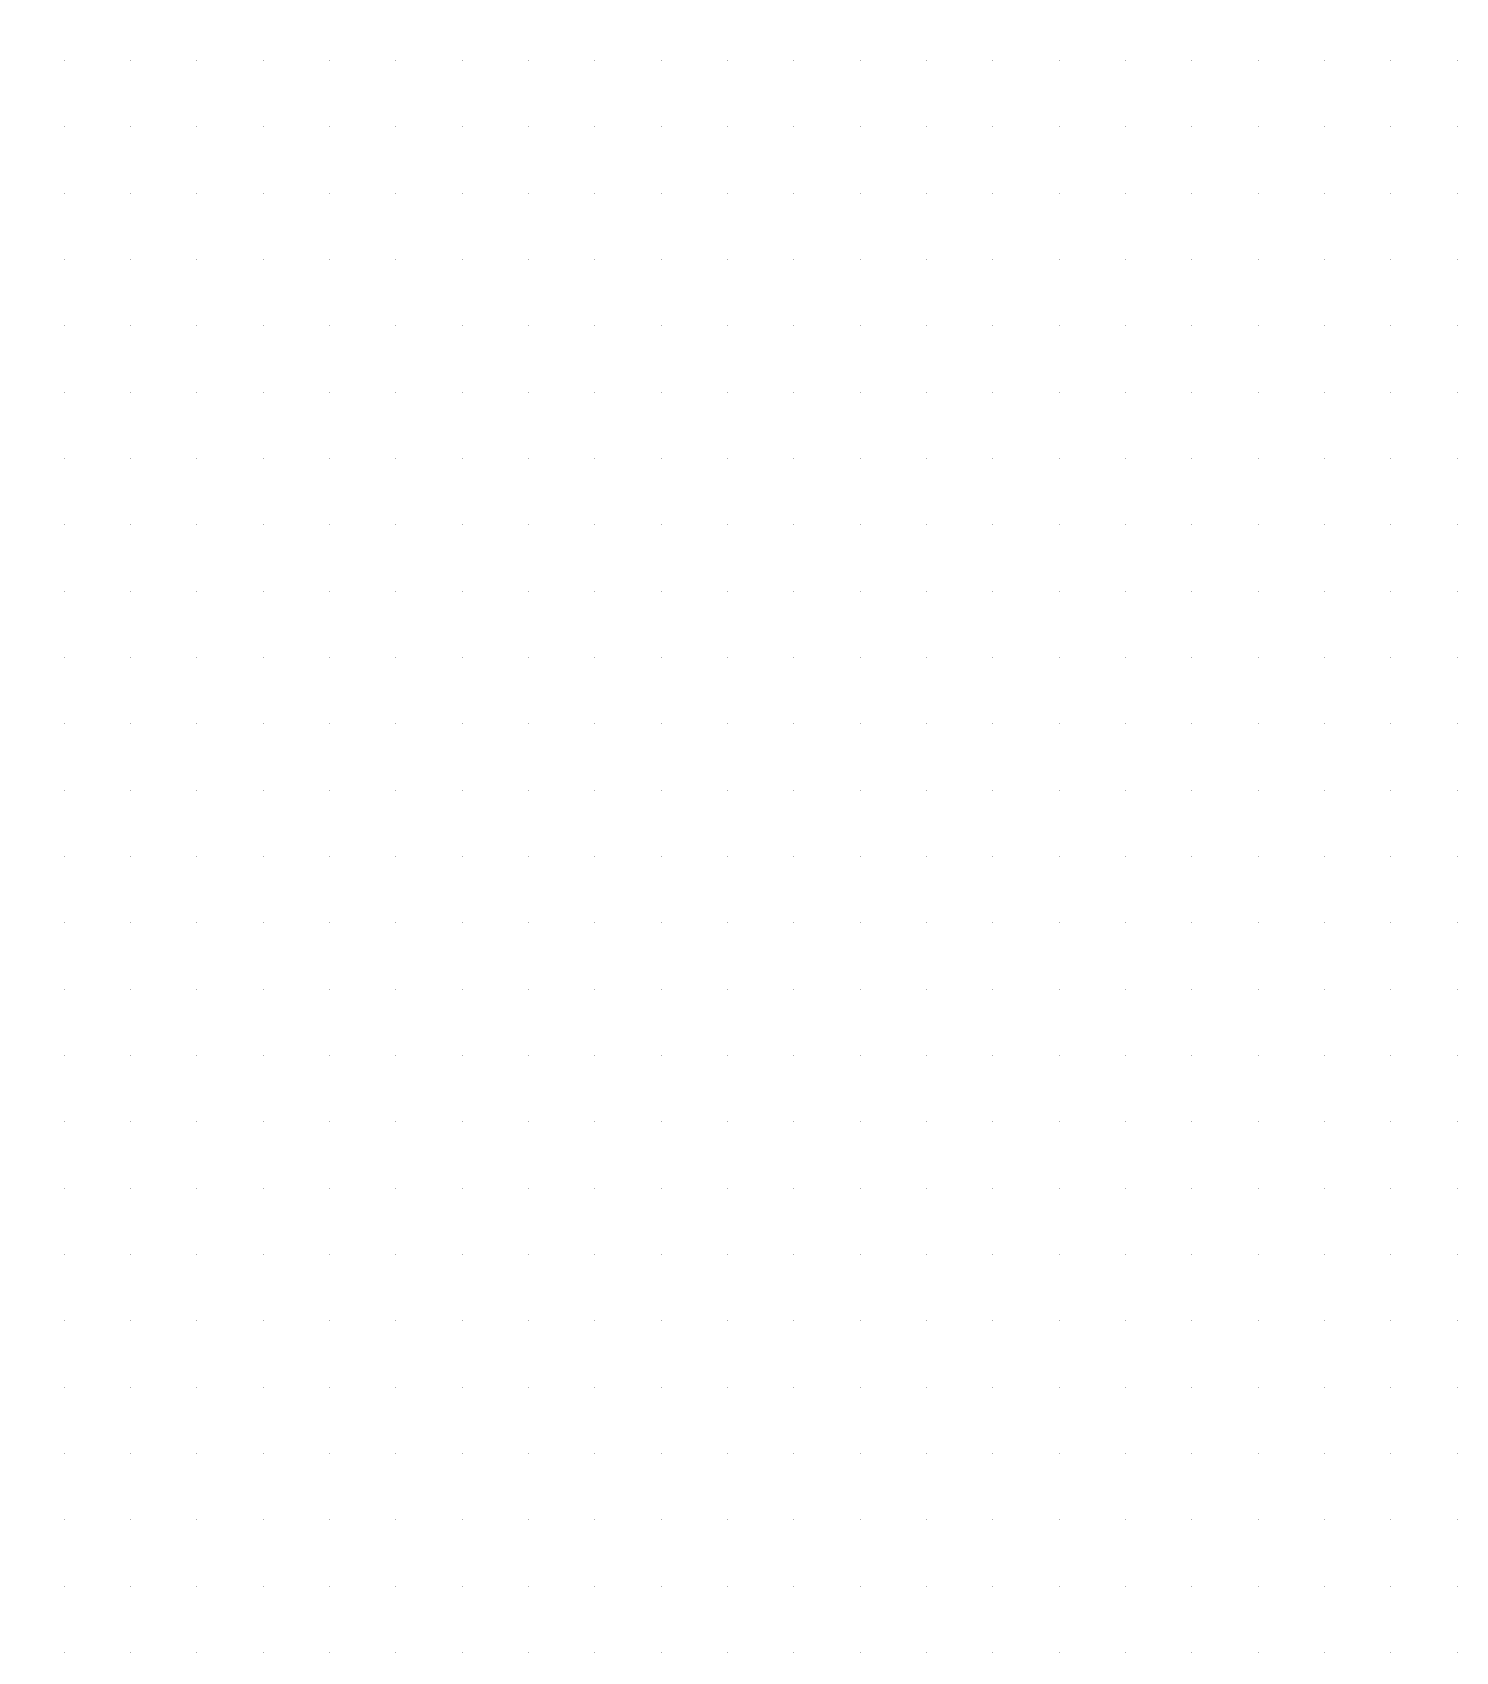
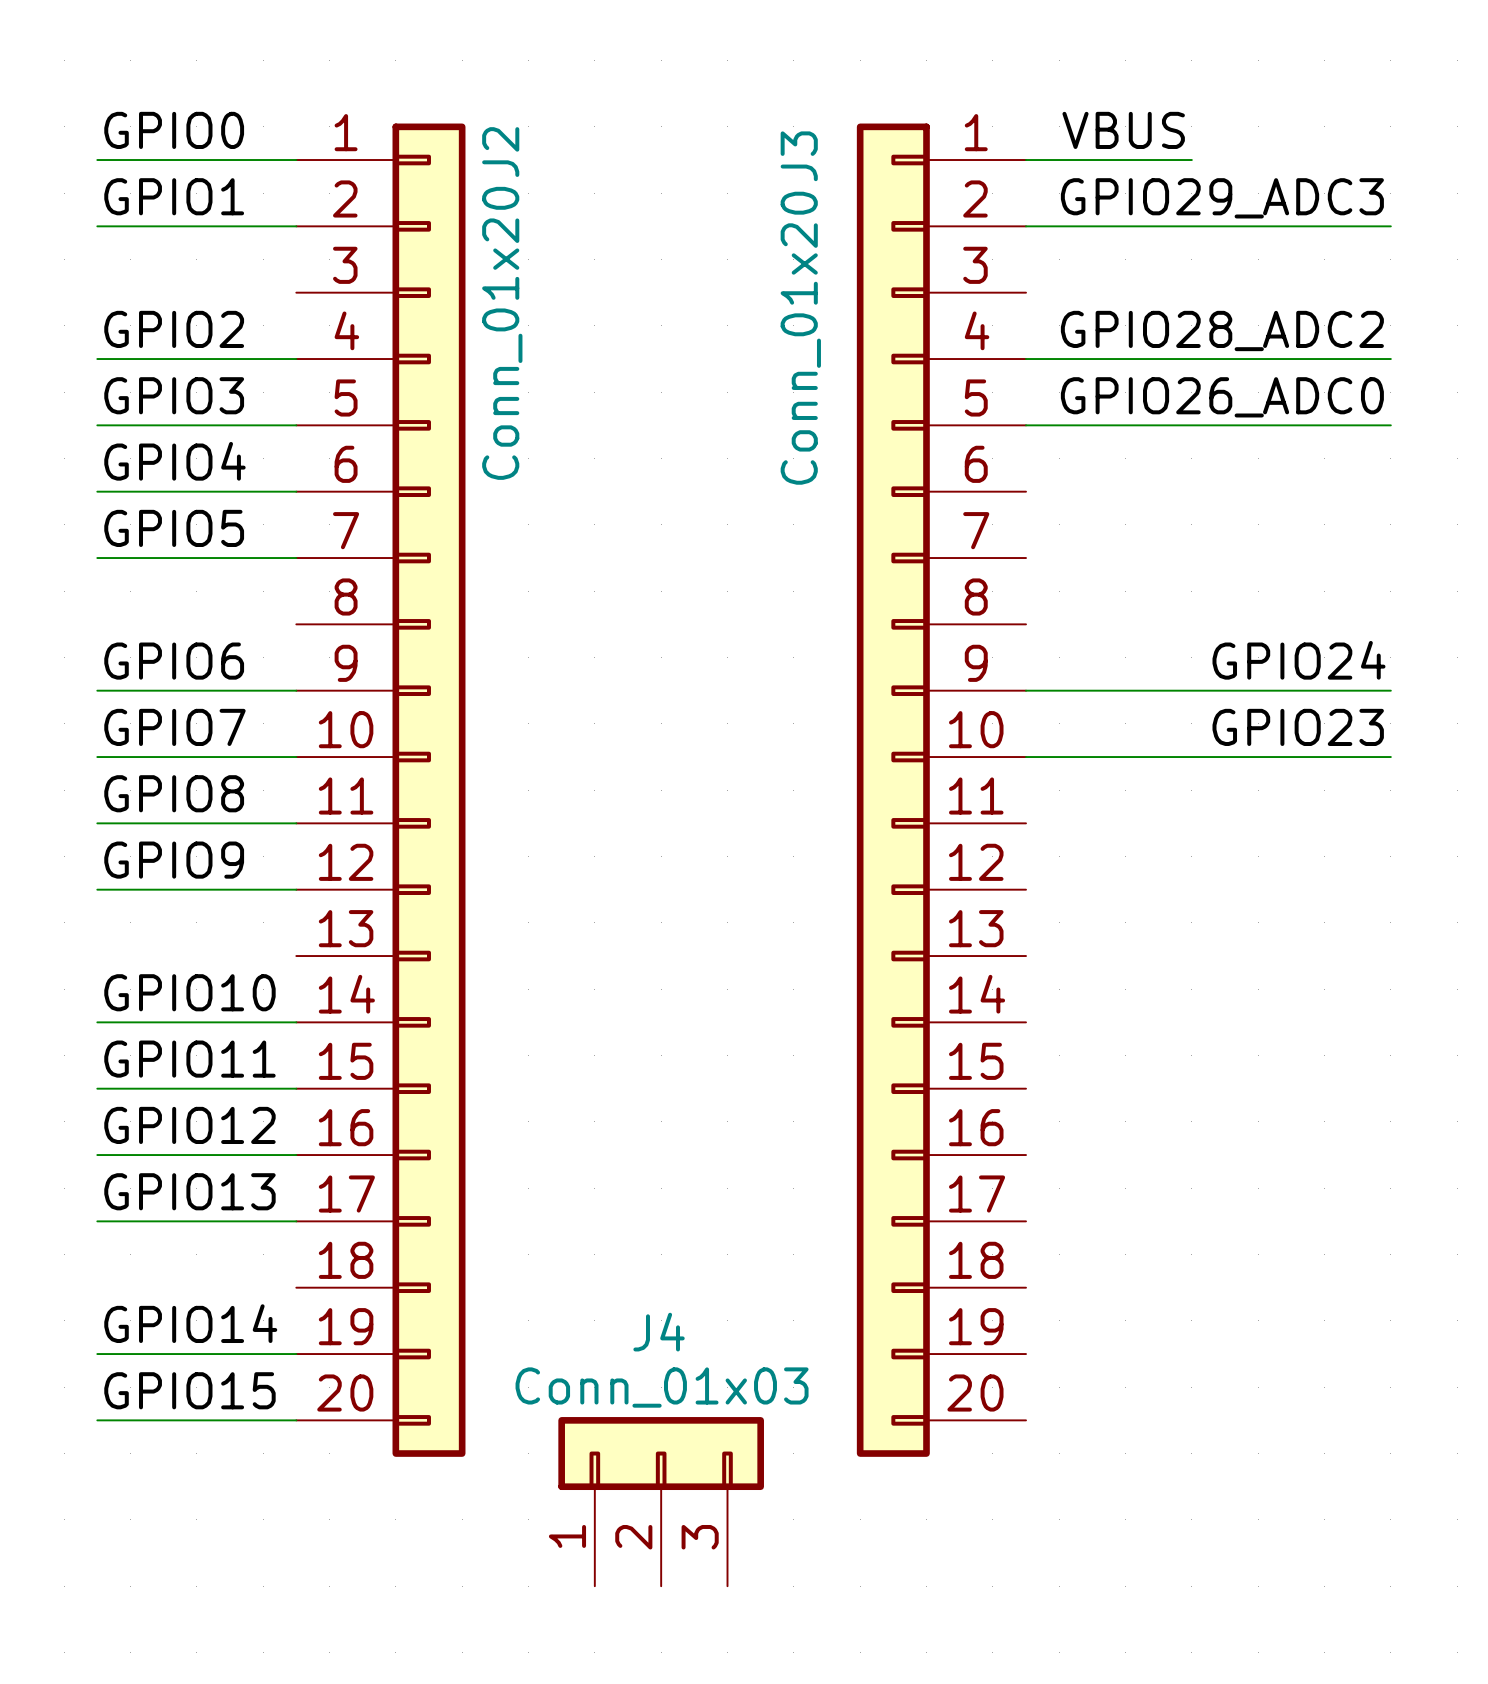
label: none -> GPIO0 (174, 130)
label: none -> VBUS (1123, 130)
wire: none -> (97, 160) (296, 160)
wire: none -> (1026, 160) (1191, 160)
label: none -> GPIO1 (174, 196)
label: none -> GPIO29_ADC3 (1222, 198)
wire: none -> (97, 226) (296, 226)
wire: none -> (1026, 226) (1390, 226)
label: none -> GPIO2 (174, 329)
label: none -> GPIO28_ADC2 (1222, 330)
wire: none -> (97, 359) (296, 359)
wire: none -> (1026, 359) (1390, 359)
label: none -> GPIO3 (174, 395)
label: none -> GPIO26_ADC0 (1222, 397)
wire: none -> (97, 425) (296, 425)
wire: none -> (1026, 425) (1390, 425)
label: none -> GPIO4 (174, 461)
wire: none -> (97, 491) (296, 491)
label: none -> GPIO5 (174, 528)
wire: none -> (97, 558) (296, 558)
label: none -> GPIO24 (1298, 660)
label: none -> GPIO6 (174, 661)
wire: none -> (97, 690) (296, 690)
wire: none -> (1026, 690) (1390, 690)
label: none -> GPIO7 (174, 727)
label: none -> GPIO23 (1298, 727)
wire: none -> (97, 757) (296, 757)
wire: none -> (1026, 757) (1390, 757)
J2: none -> Conn_01x20 (380, 790)
J3: none -> Conn_01x20 (941, 790)
label: none -> GPIO8 (174, 793)
wire: none -> (97, 823) (296, 823)
label: none -> GPIO9 (174, 860)
wire: none -> (97, 889) (296, 889)
label: none -> GPIO10 (189, 992)
wire: none -> (97, 1022) (296, 1022)
label: none -> GPIO11 (189, 1059)
wire: none -> (97, 1088) (296, 1088)
label: none -> GPIO12 (189, 1125)
wire: none -> (97, 1155) (296, 1155)
label: none -> GPIO13 (189, 1191)
wire: none -> (97, 1221) (296, 1221)
label: none -> GPIO14 (190, 1323)
wire: none -> (97, 1354) (296, 1354)
label: none -> GPIO15 (189, 1390)
wire: none -> (97, 1420) (296, 1420)
J4: none -> Conn_01x03 (661, 1501)

